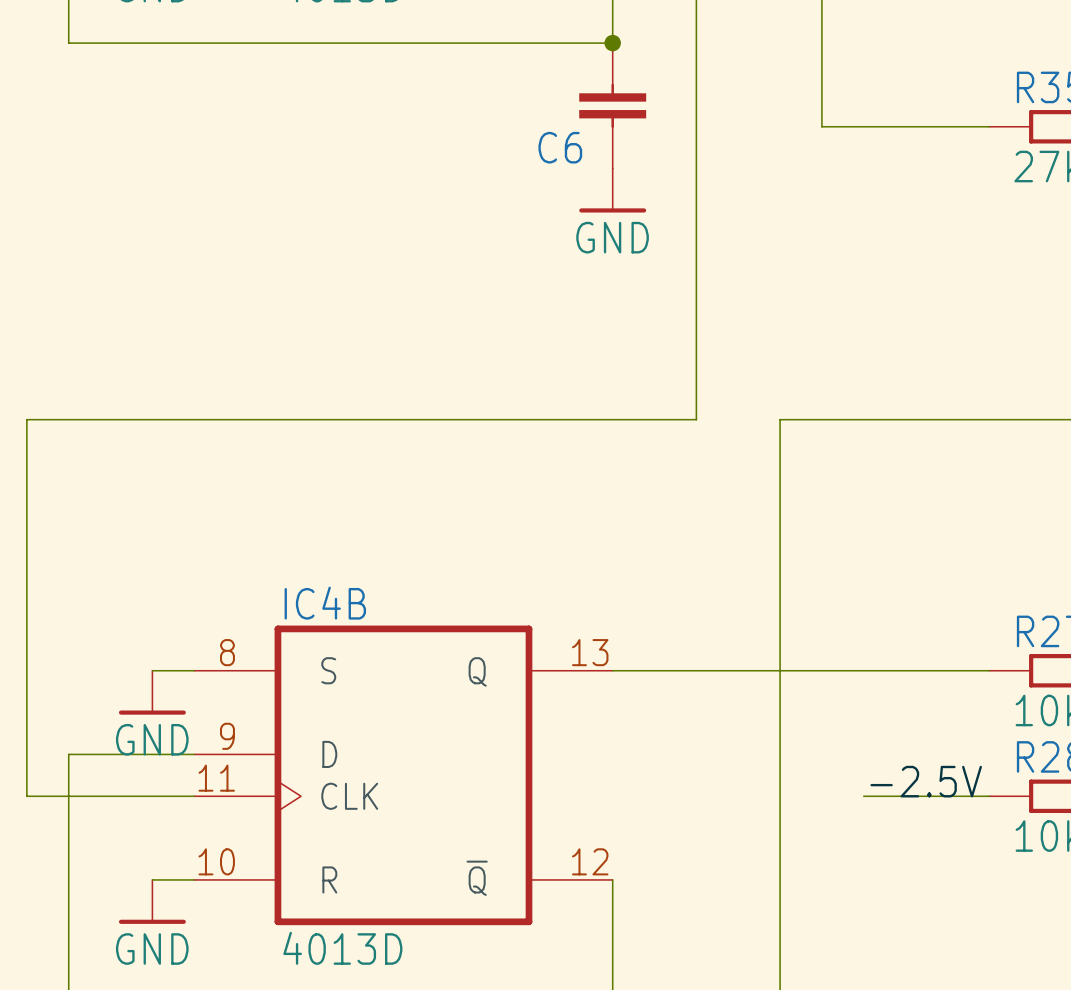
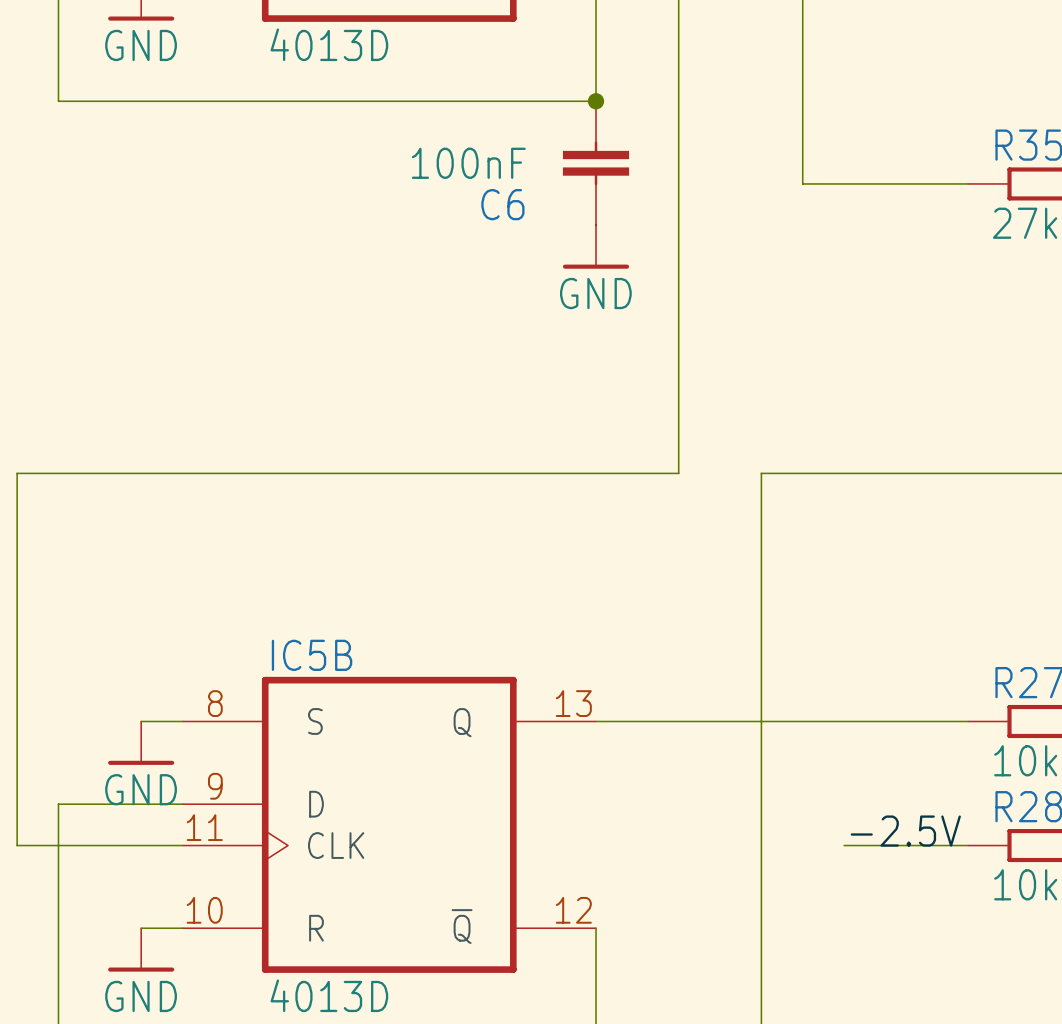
C6 value: none -> 100nF (468, 163)
C6 name position: C6 (560, 147) -> C6 (502, 204)
IC4B name: IC4B (325, 603) -> IC5B (312, 655)

